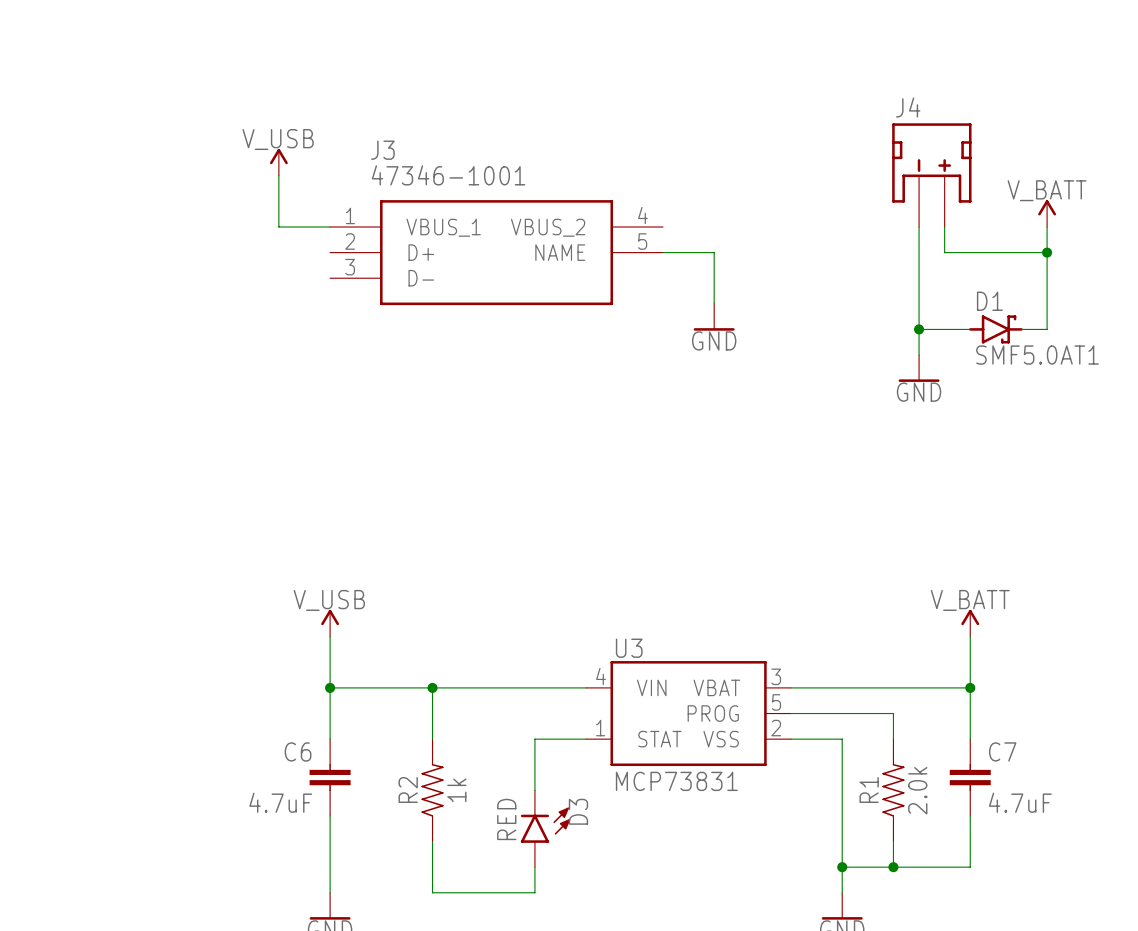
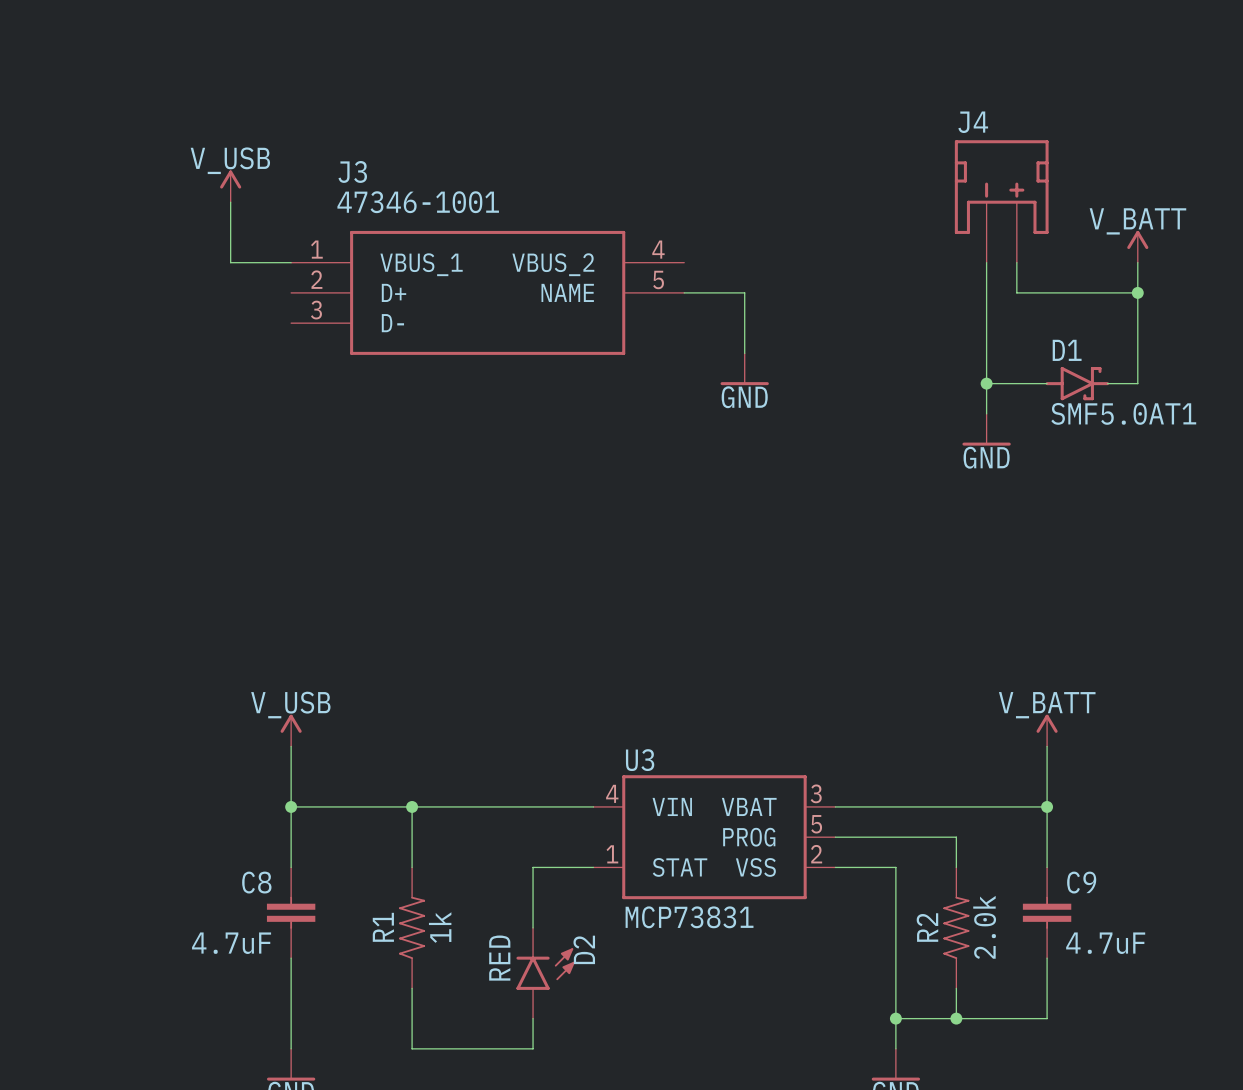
C6 name: C6 (298, 751) -> C8 (256, 882)
C7 name: C7 (1002, 751) -> C9 (1081, 882)
R2 name: R2 (408, 789) -> R1 (383, 927)
R1 name: R1 (869, 789) -> R2 (927, 927)
D3 name: D3 (578, 811) -> D2 (584, 949)

